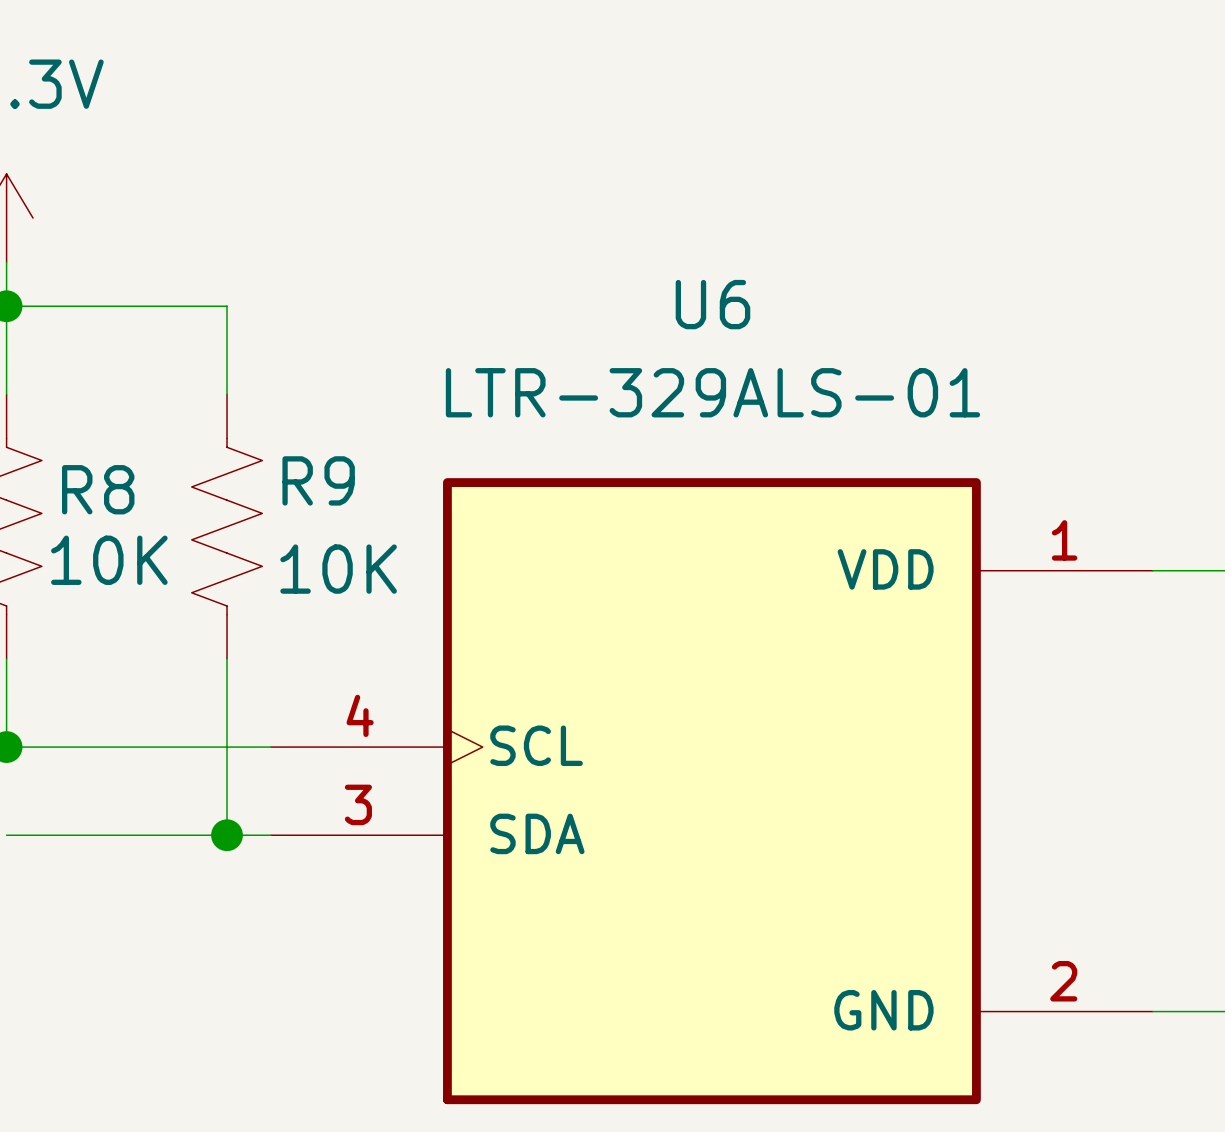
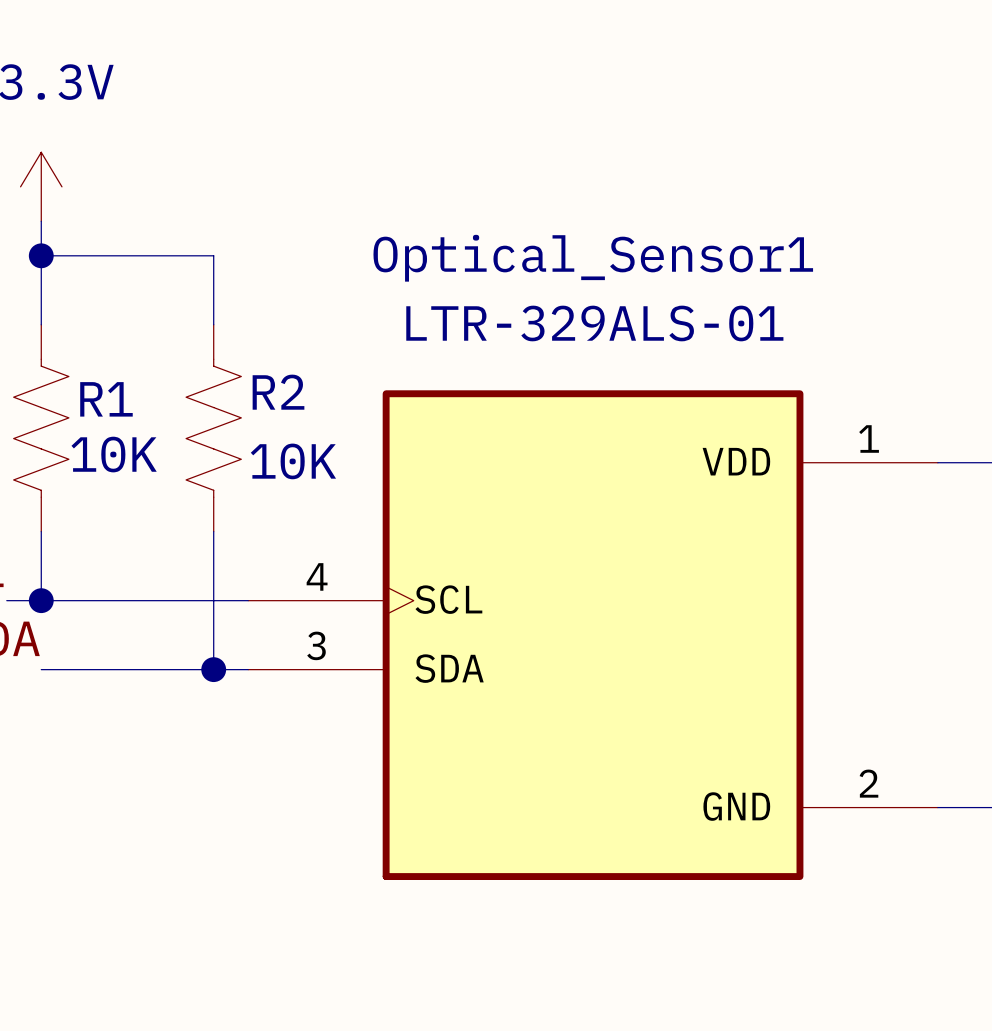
U6 name: U6 (712, 304) -> Optical_Sensor1 (593, 258)
R9 name: R9 (318, 480) -> R2 (278, 392)
R8 name: R8 (98, 489) -> R1 (106, 399)

